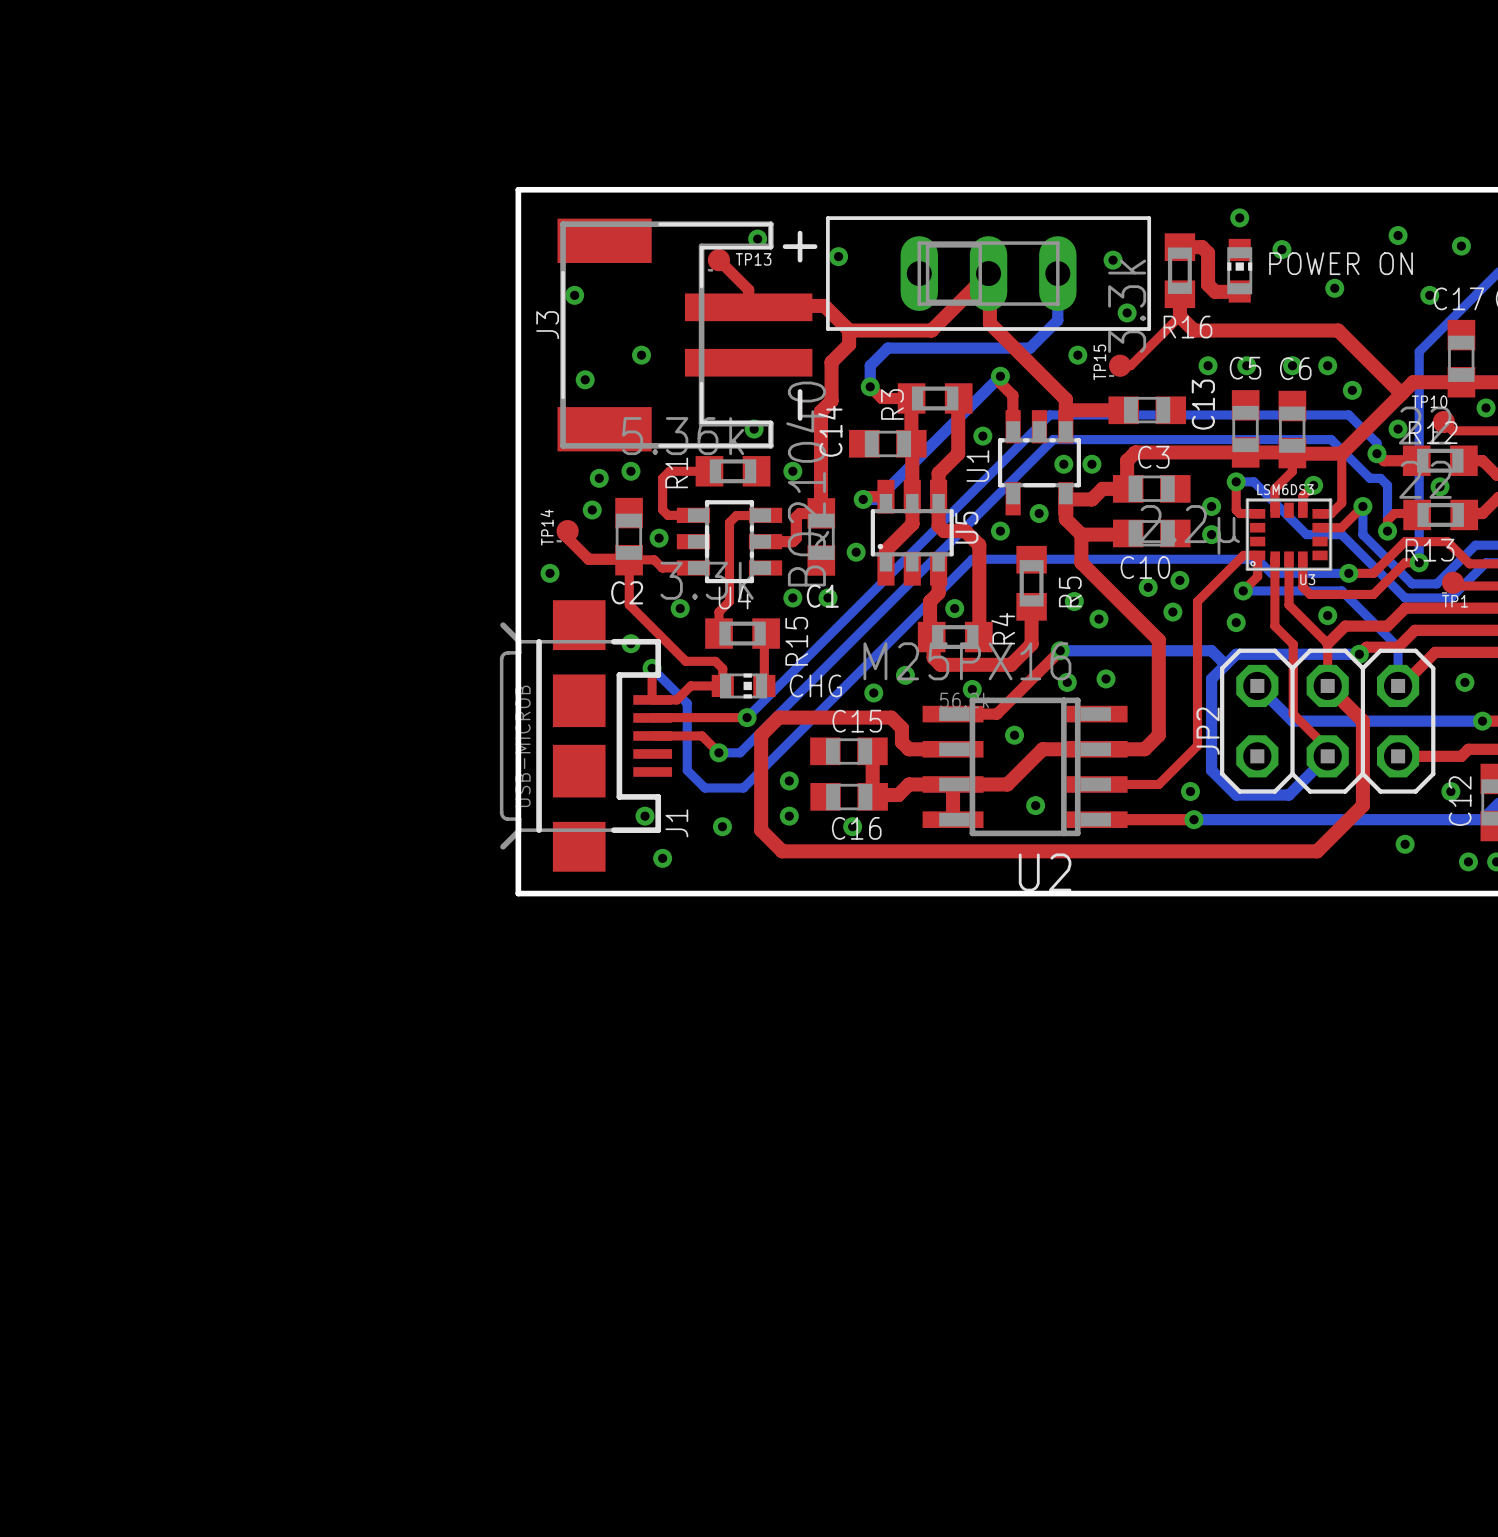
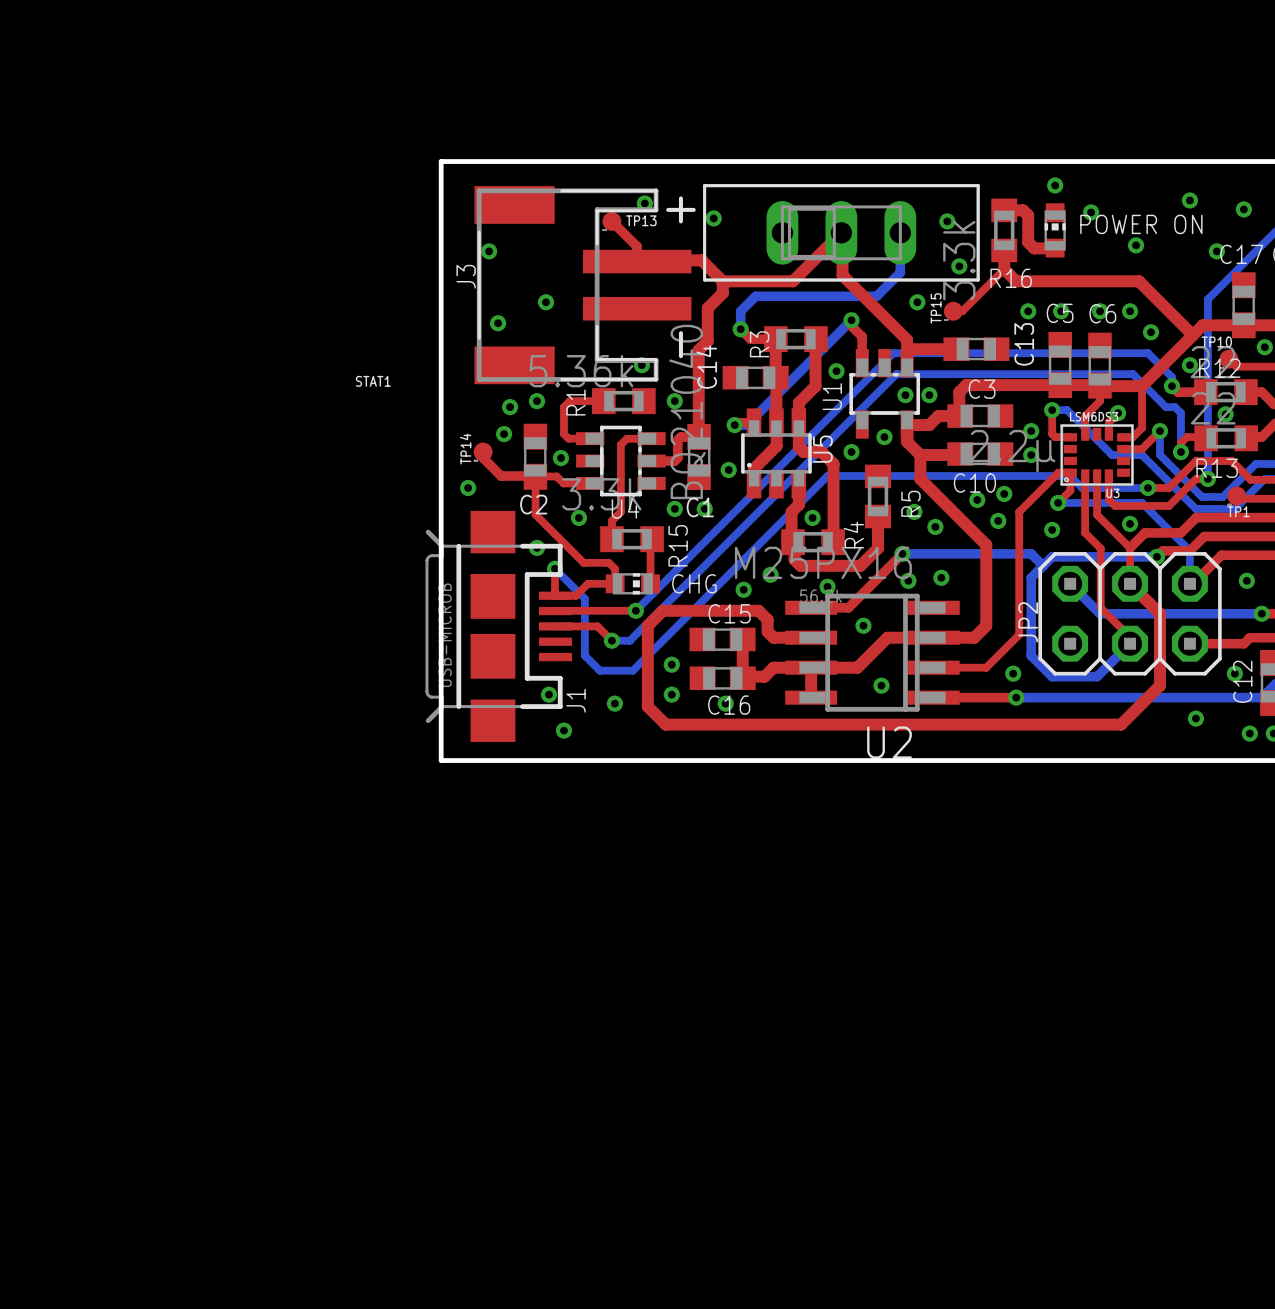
text: none -> STAT1 (373, 381)

